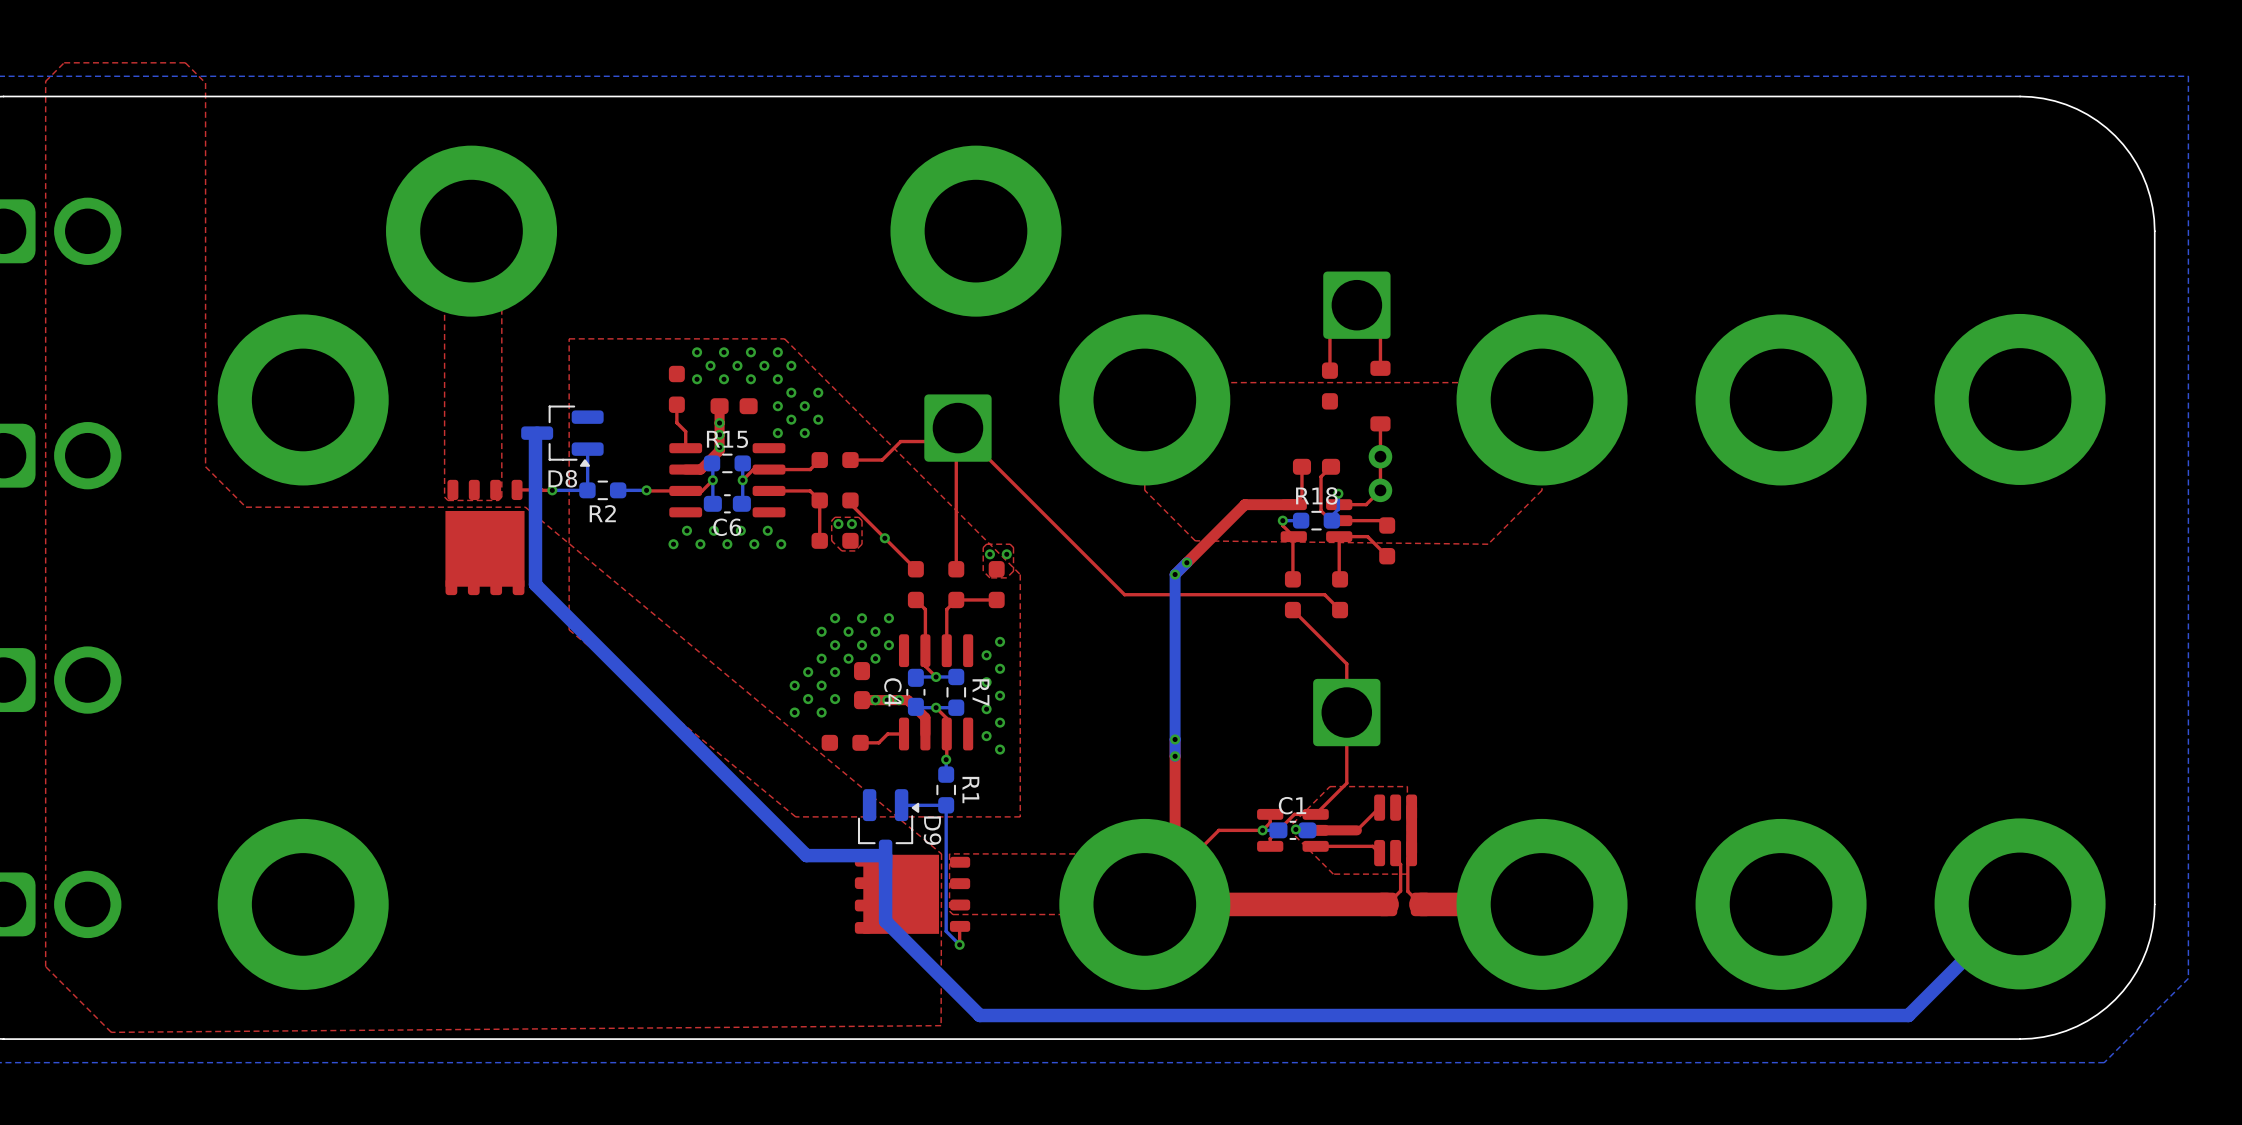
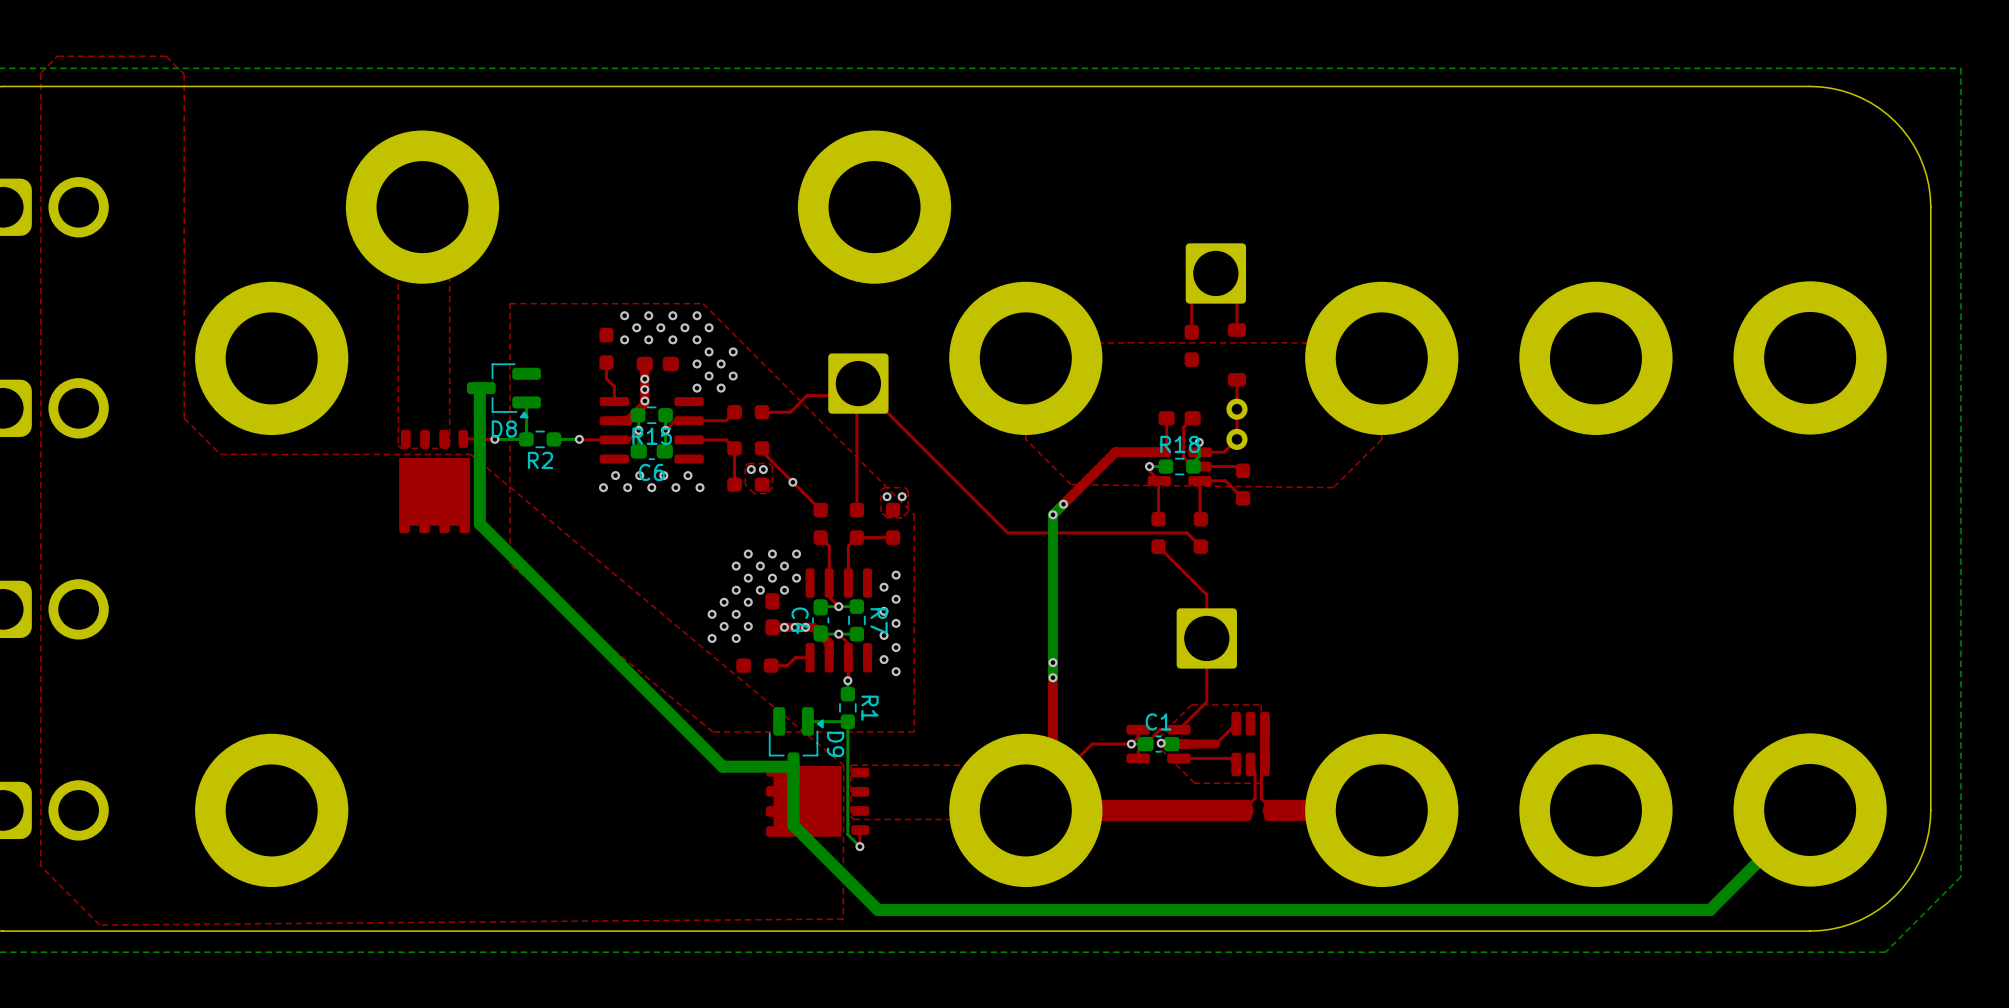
R15 name position: R15 (727, 439) -> R15 (652, 436)

